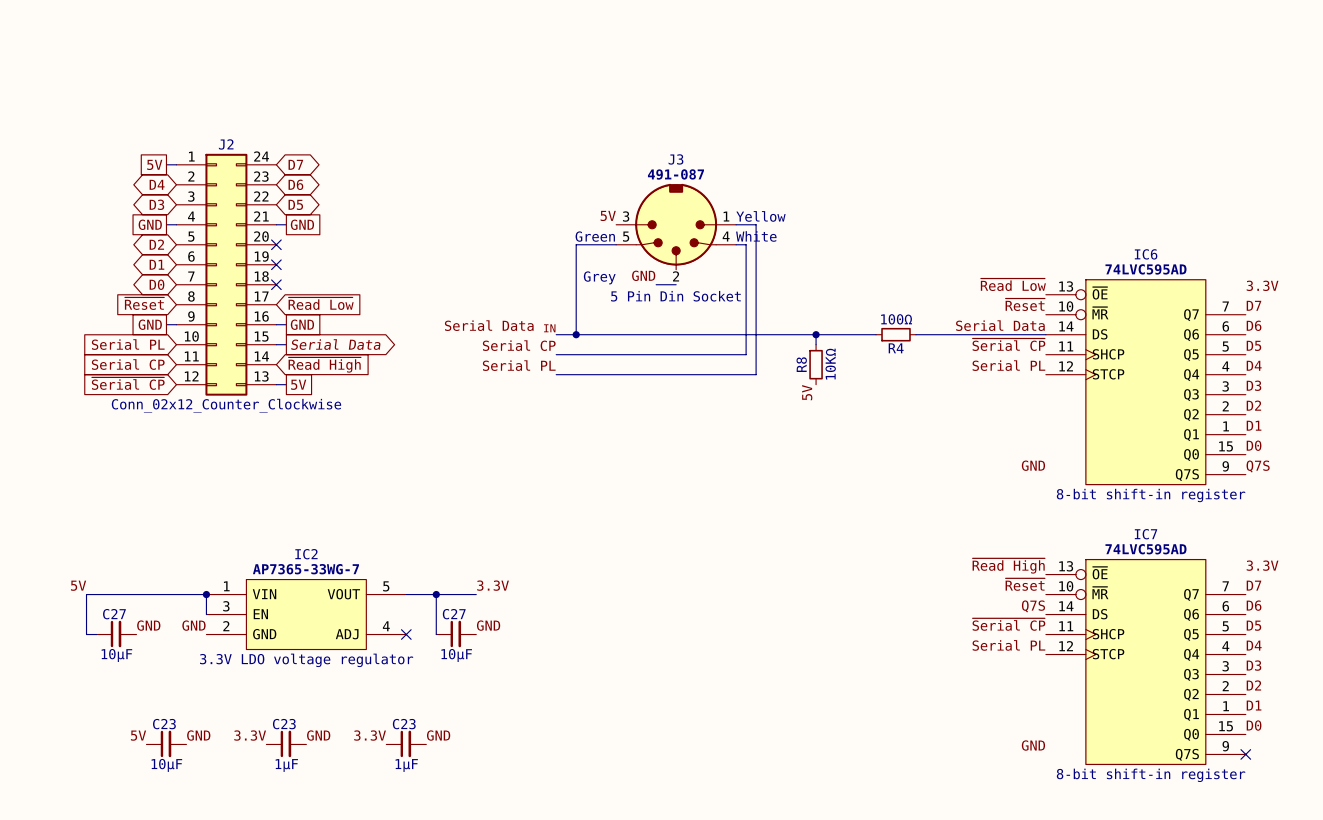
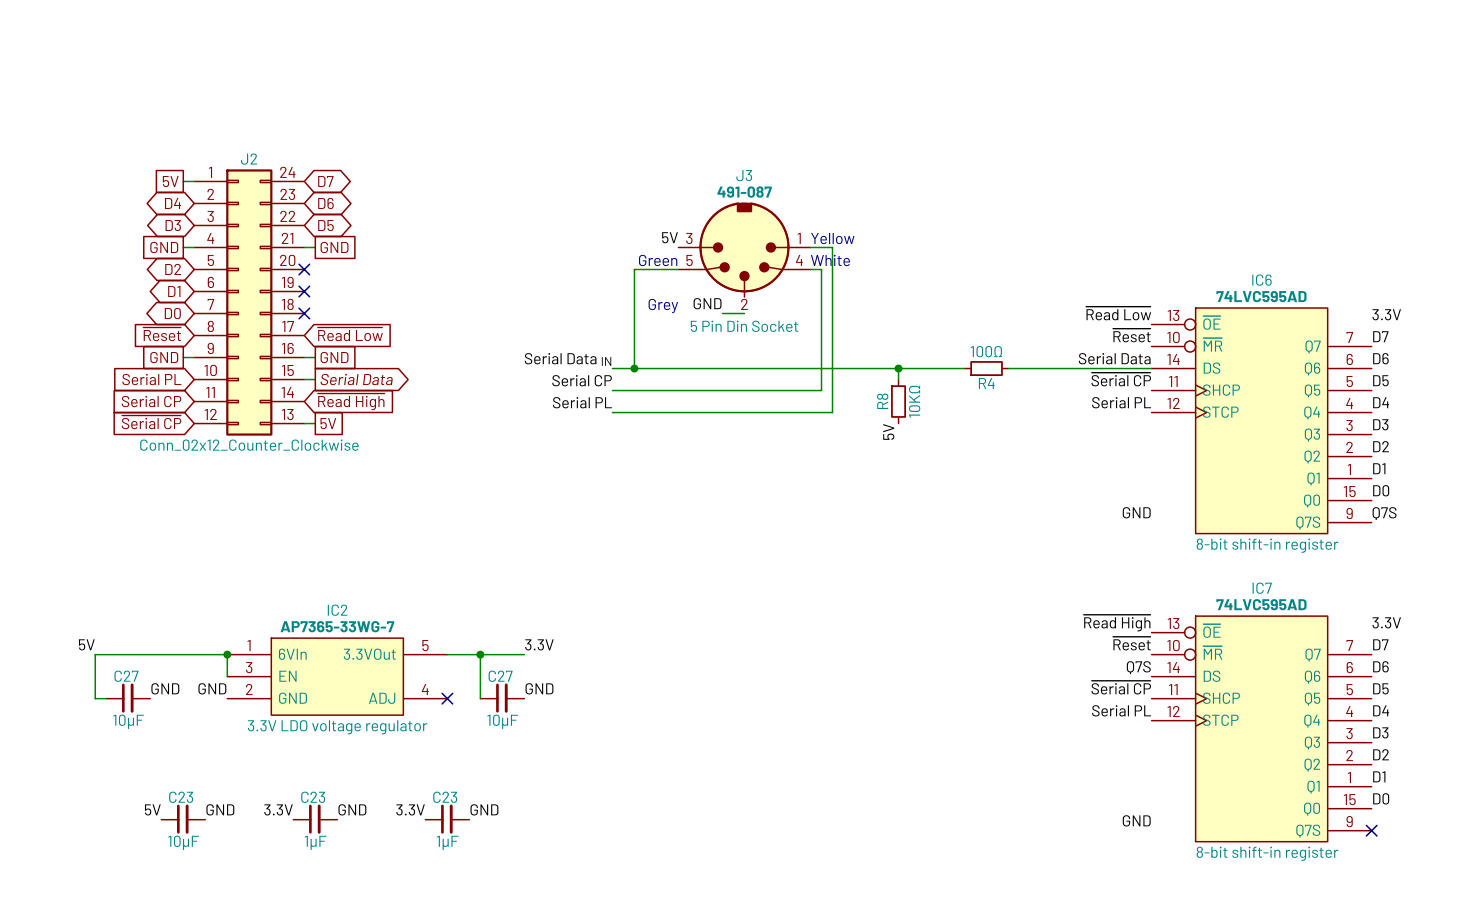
IC2 pin name: VIN (264, 594) -> 6VIn (292, 654)
IC2 pin name: VOUT (343, 594) -> 3.3VOut (369, 654)

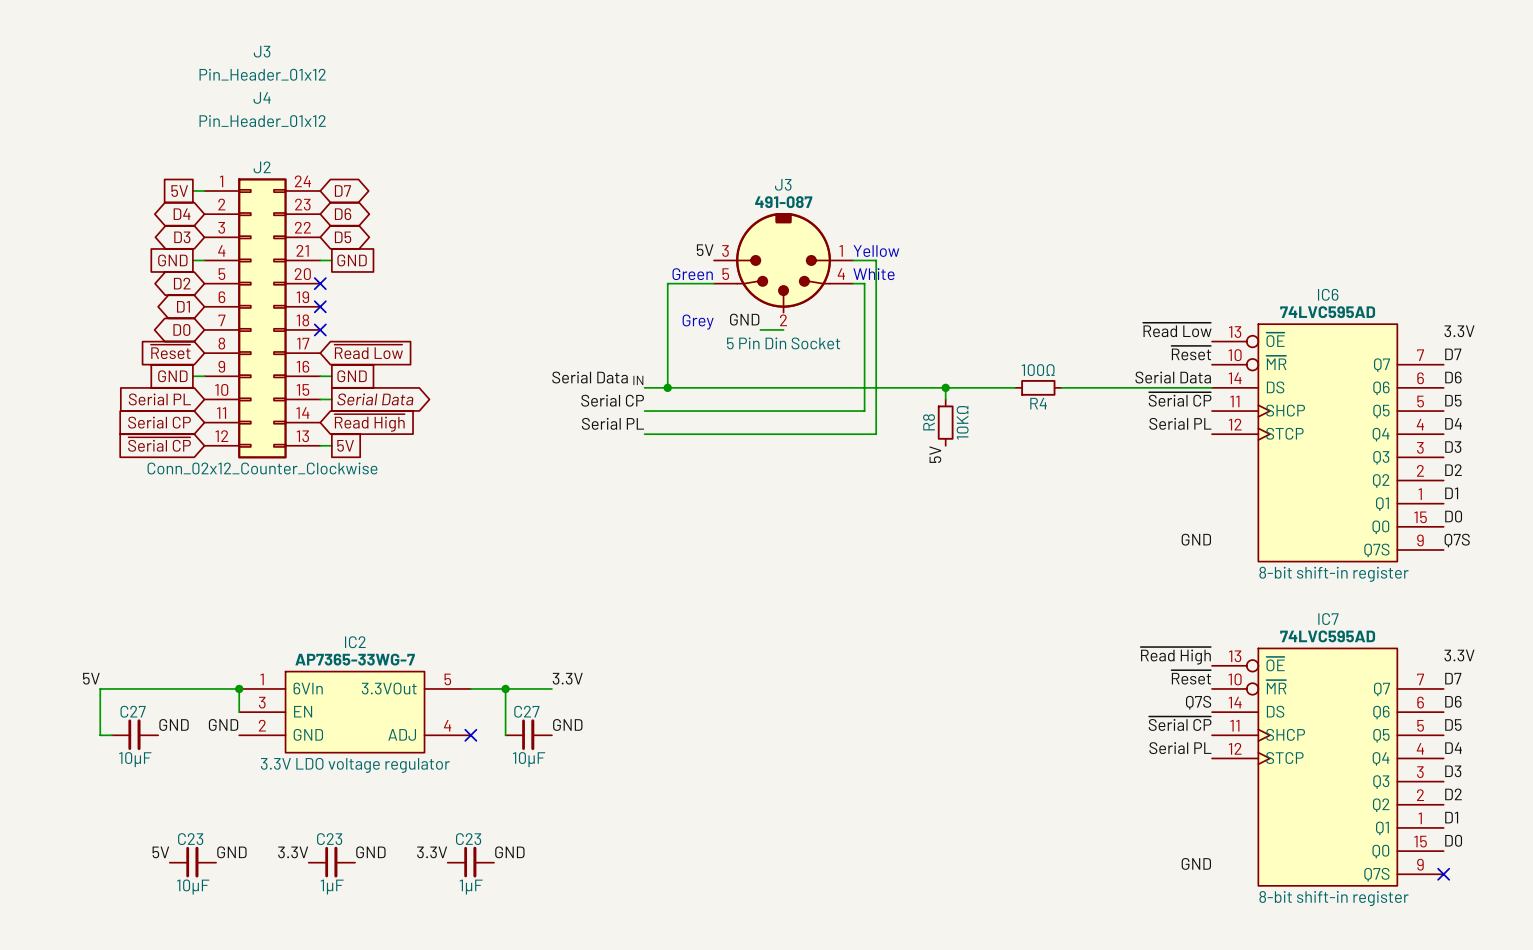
J3: none -> Pin_Header_01x12 (262, 63)
J4: none -> Pin_Header_01x12 (262, 109)

